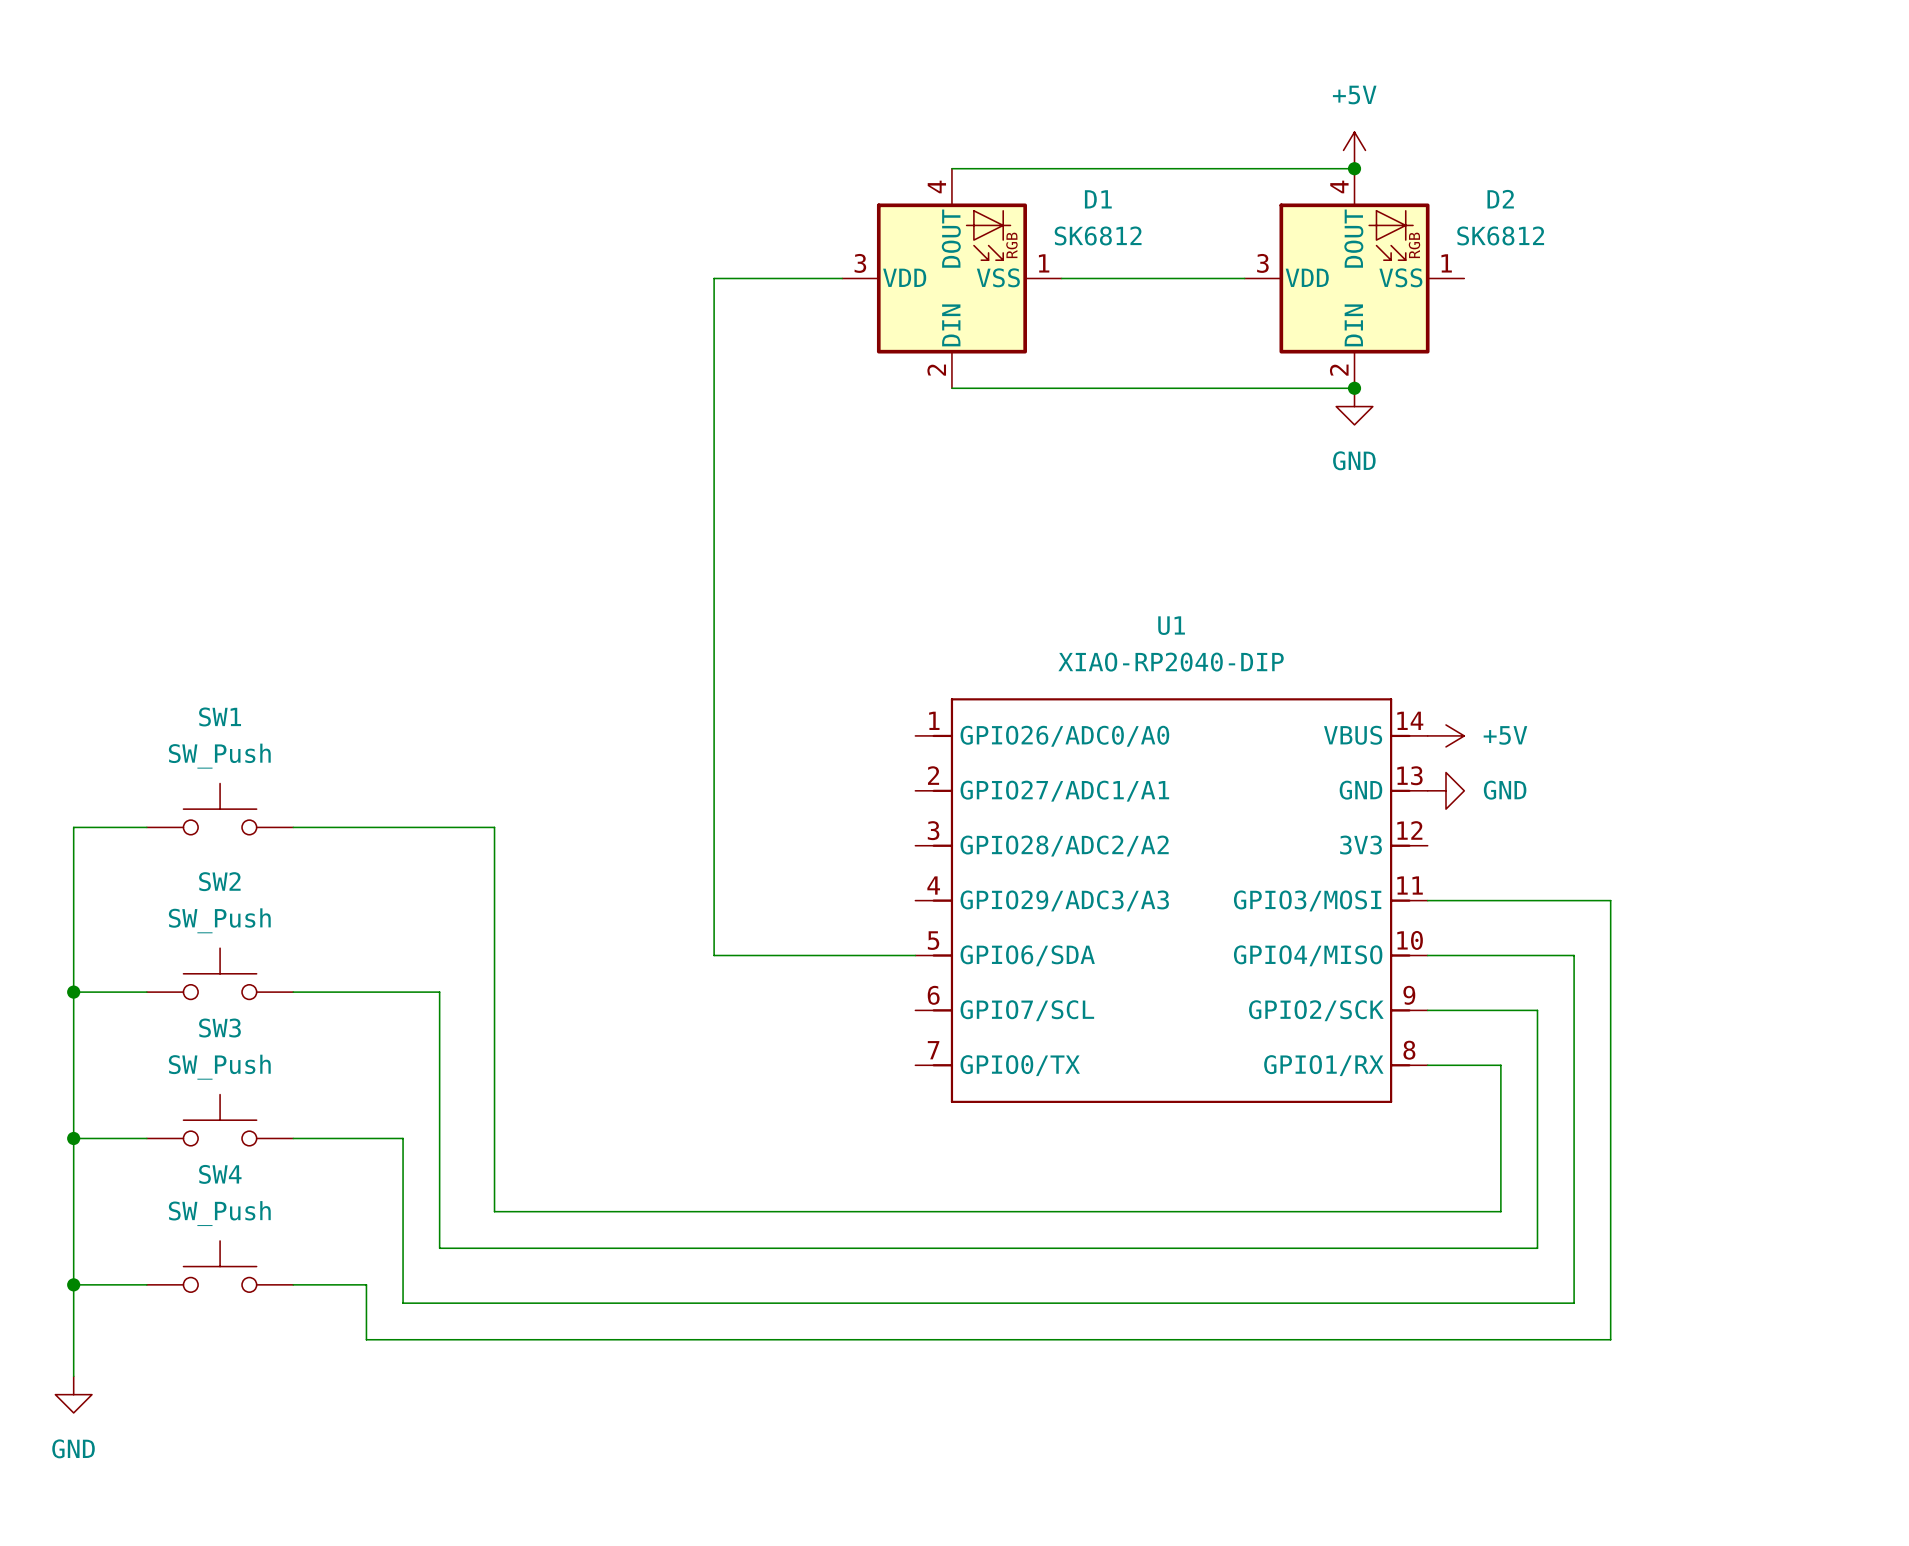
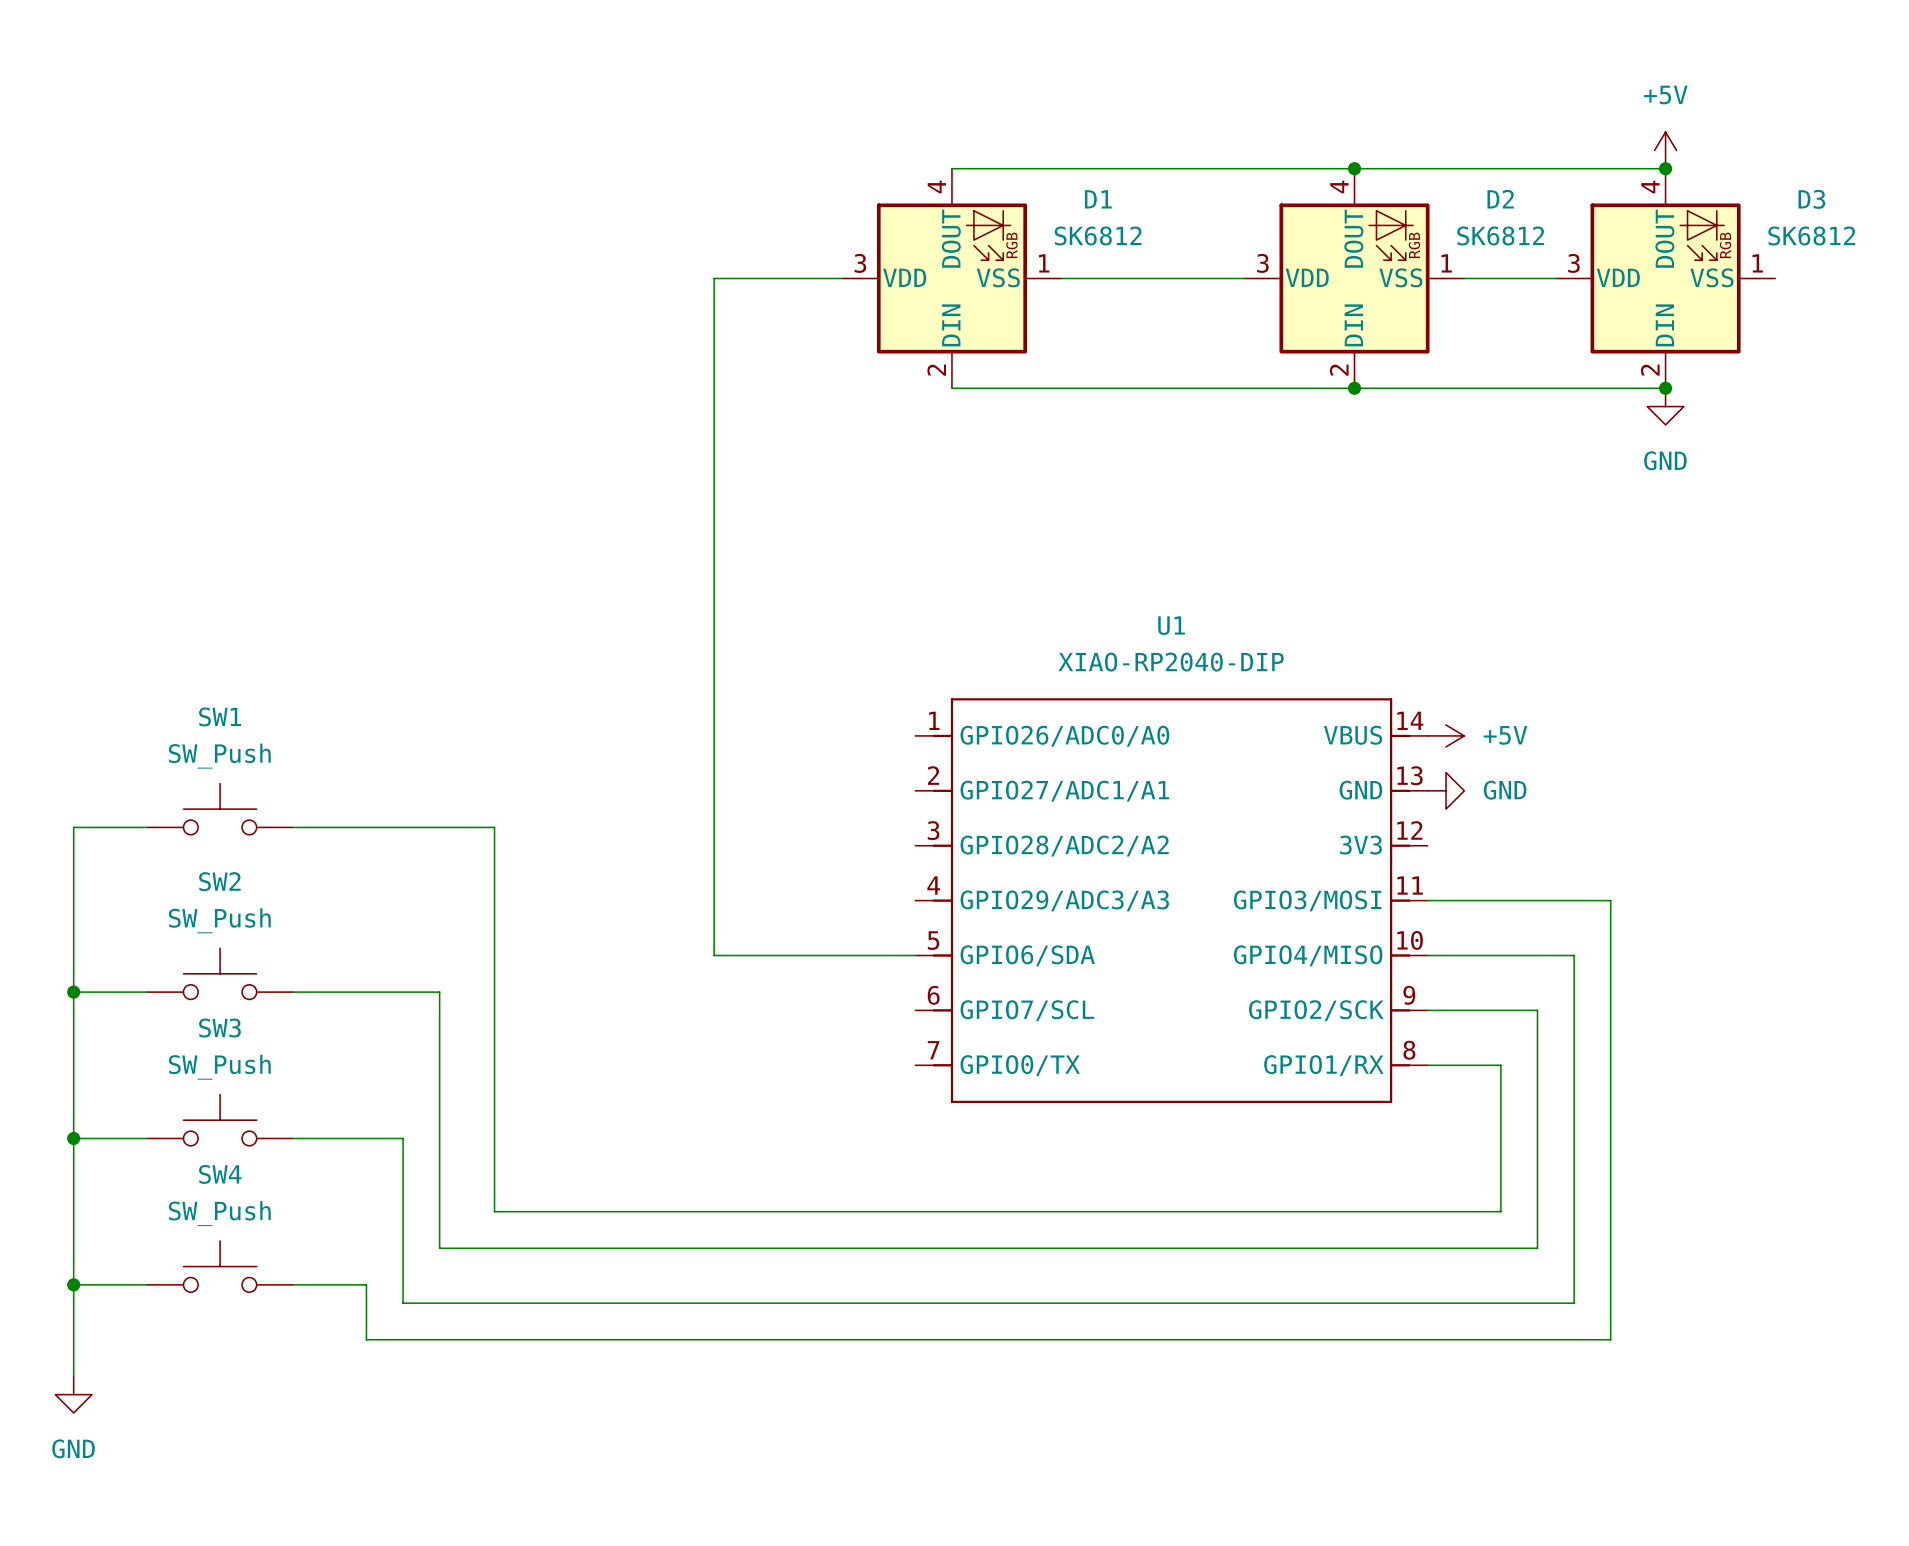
power symbol position: +5V (1354, 150) -> +5V (1665, 150)
wire: none -> (1354, 168) (1665, 168)
junction: none -> (1665, 168)
wire: none -> (1464, 278) (1555, 278)
D3: none -> SK6812 (1665, 278)
wire: none -> (1354, 388) (1665, 388)
junction: none -> (1665, 388)
power symbol position: GND (1354, 406) -> GND (1665, 406)

